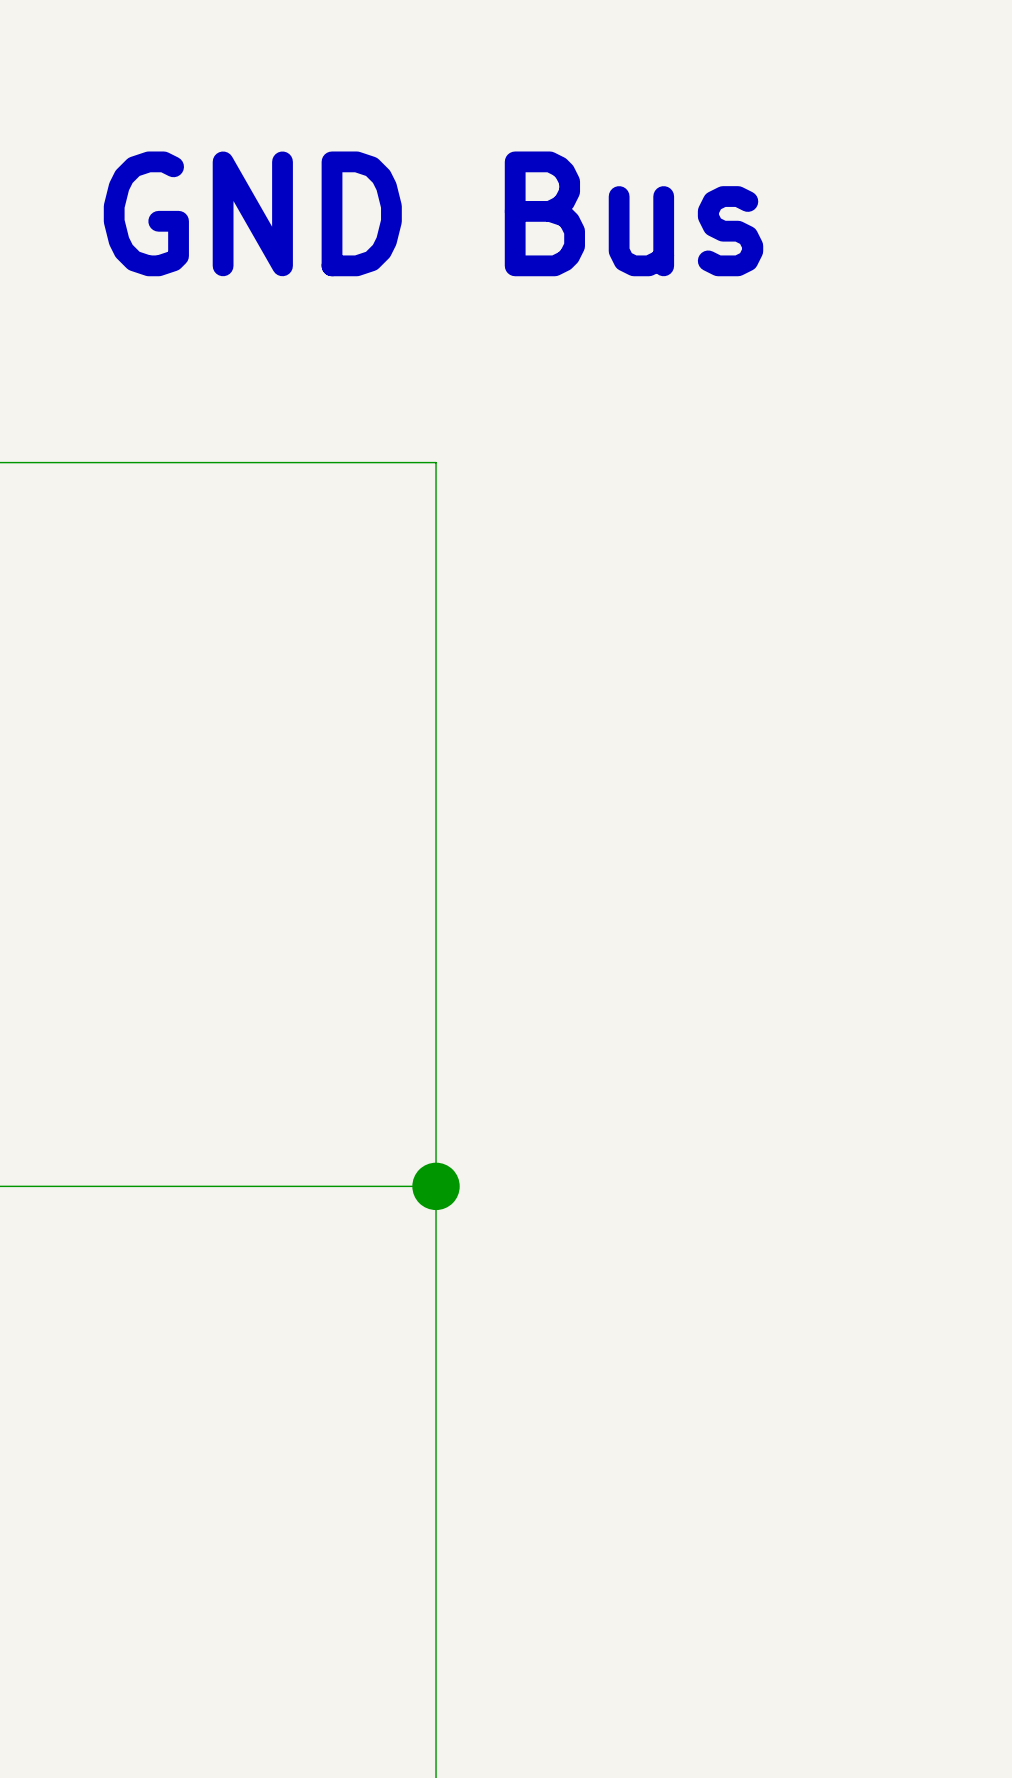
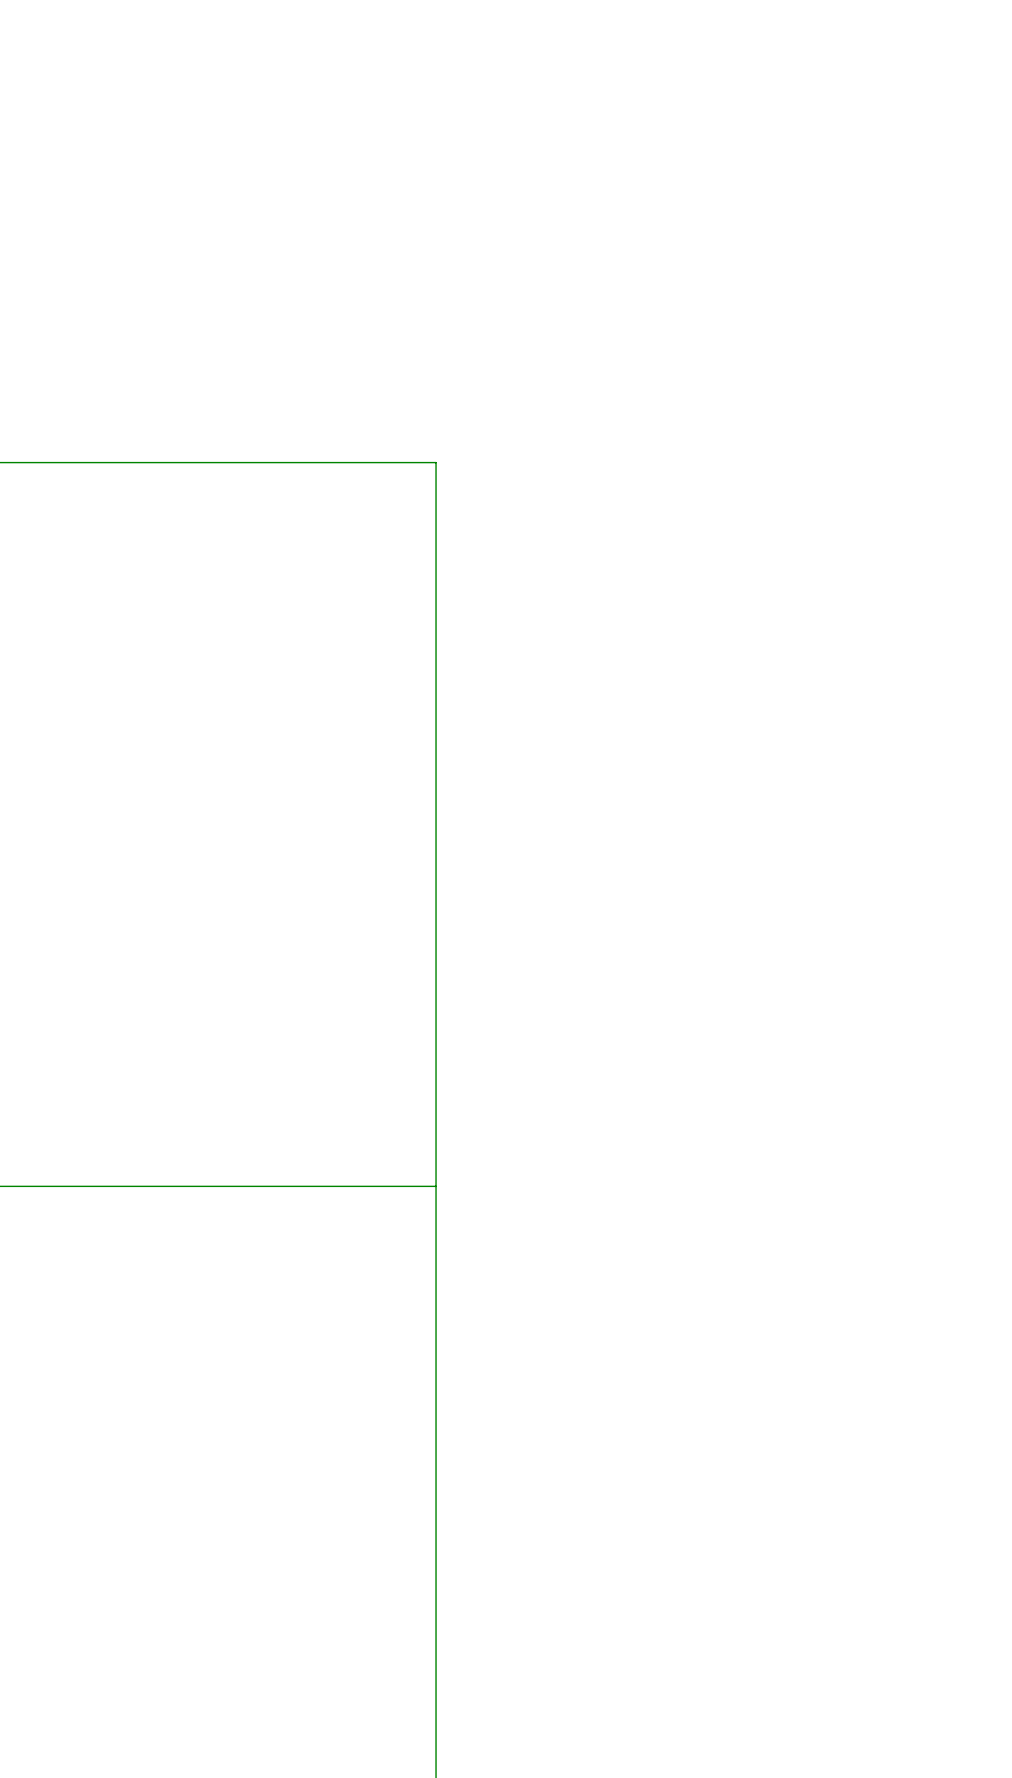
text: GND Bus (433, 213) -> none
junction: (436, 1186) -> none

